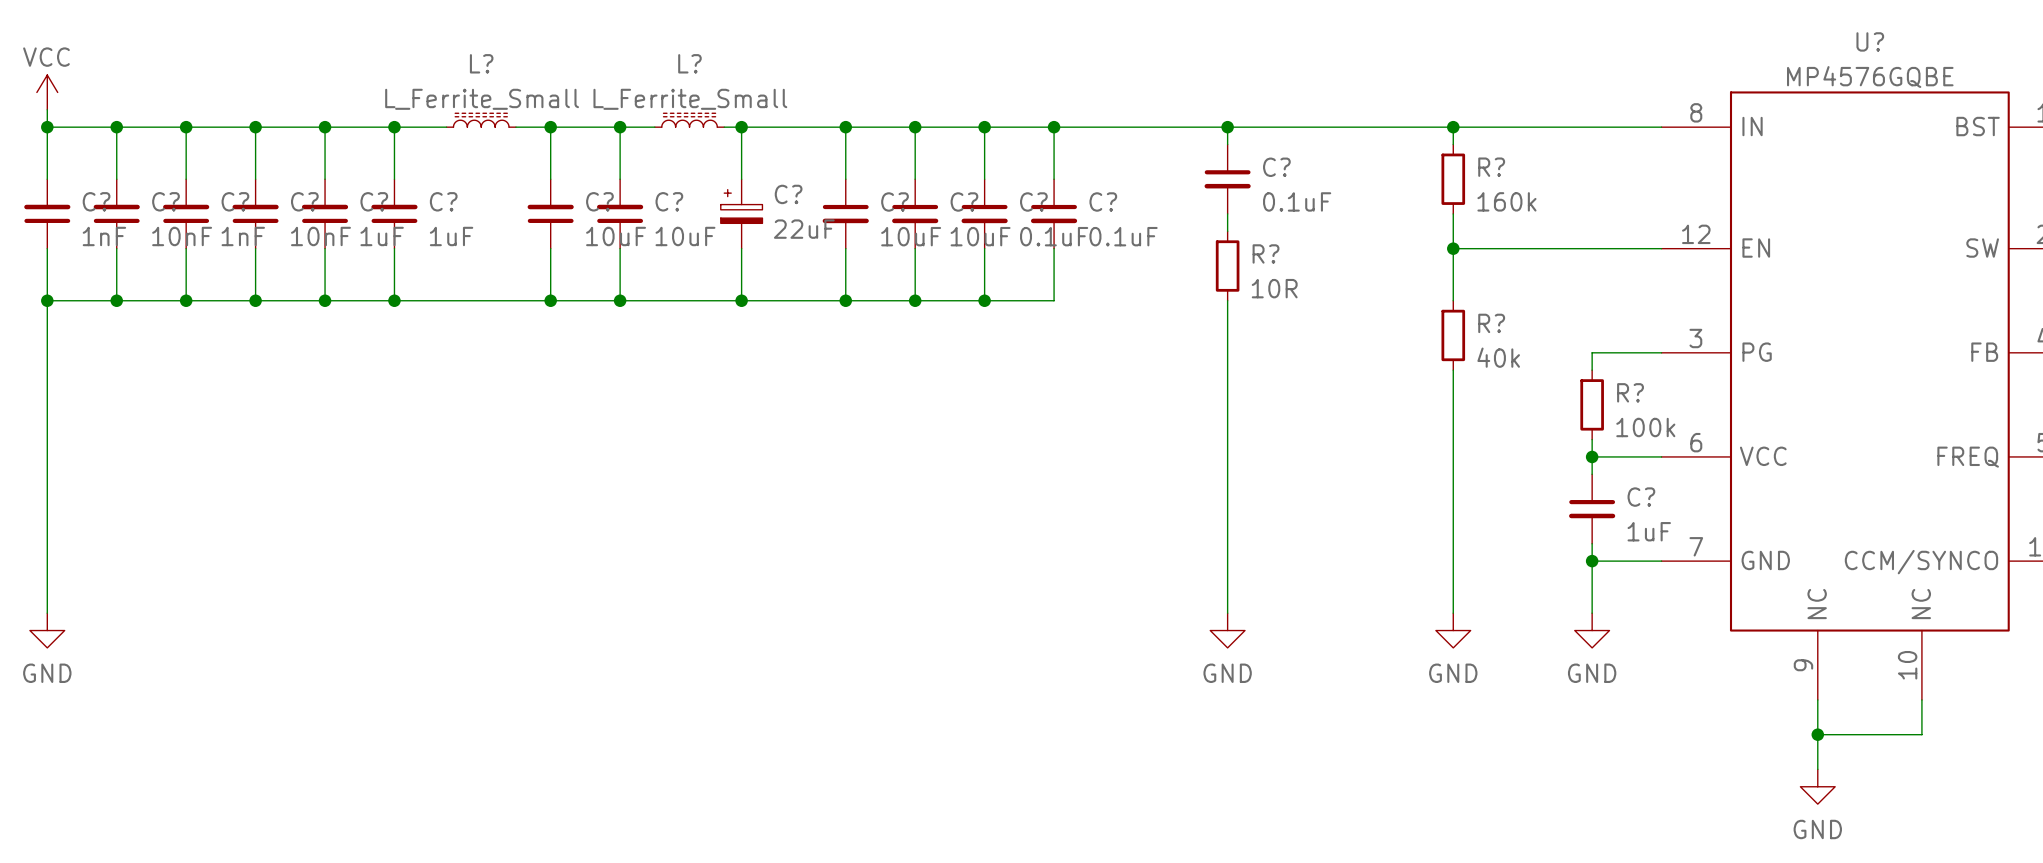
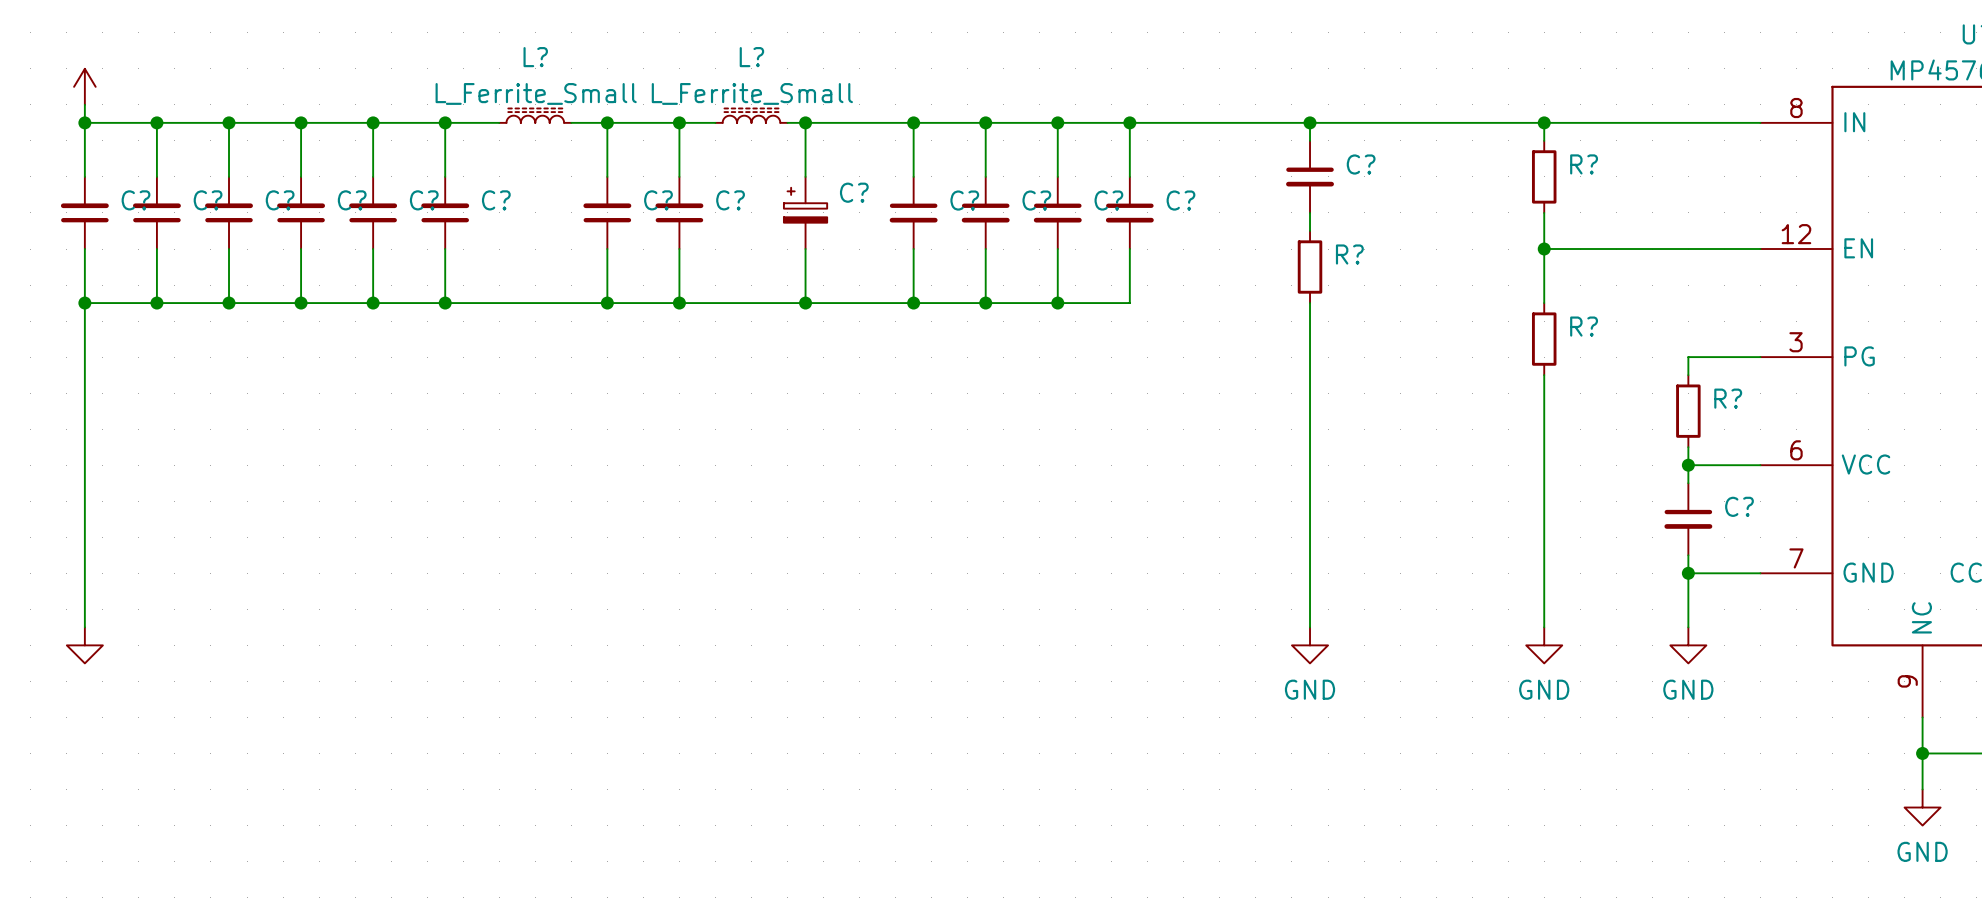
power symbol text: VCC (46, 57) -> none
C? value: 0.1uF (1297, 201) -> none
R? value: 160k (1506, 201) -> none
C? value: 22uF (804, 229) -> none
C? value: 1nF (104, 236) -> none
C? value: 10nF (182, 236) -> none
C? value: 1nF (243, 236) -> none
C? value: 10nF (320, 236) -> none
C? value: 1uF (382, 236) -> none
C? value: 1uF (451, 236) -> none
C? value: 10uF (616, 236) -> none
C? value: 10uF (685, 236) -> none
C? value: 10uF (911, 236) -> none
C? value: 10uF (980, 236) -> none
C? value: 0.1uF (1054, 236) -> none
C? value: 0.1uF (1123, 236) -> none
R? value: 10R (1274, 288) -> none
R? value: 40k (1498, 357) -> none
R? value: 100k (1645, 427) -> none
C? value: 1uF (1649, 531) -> none
power symbol text: GND (47, 673) -> none

